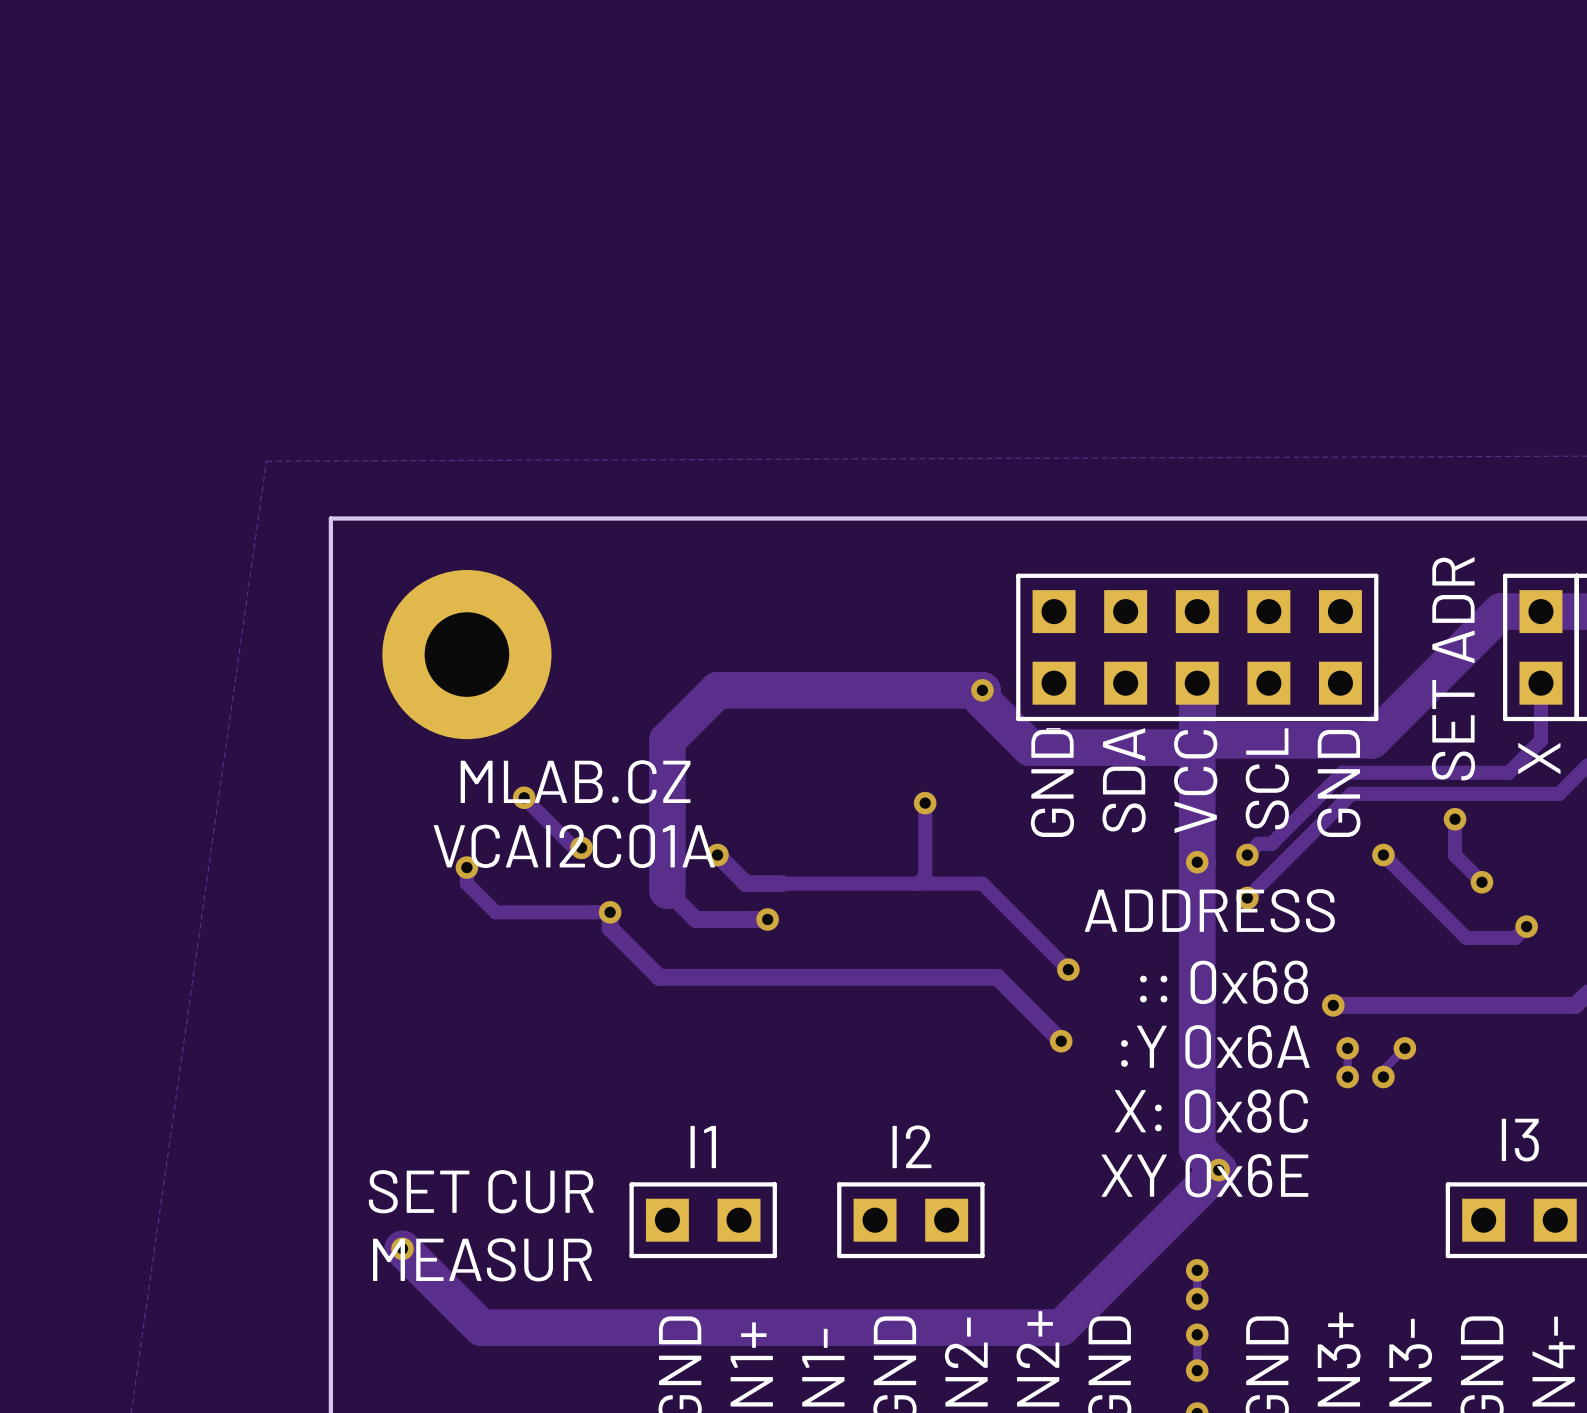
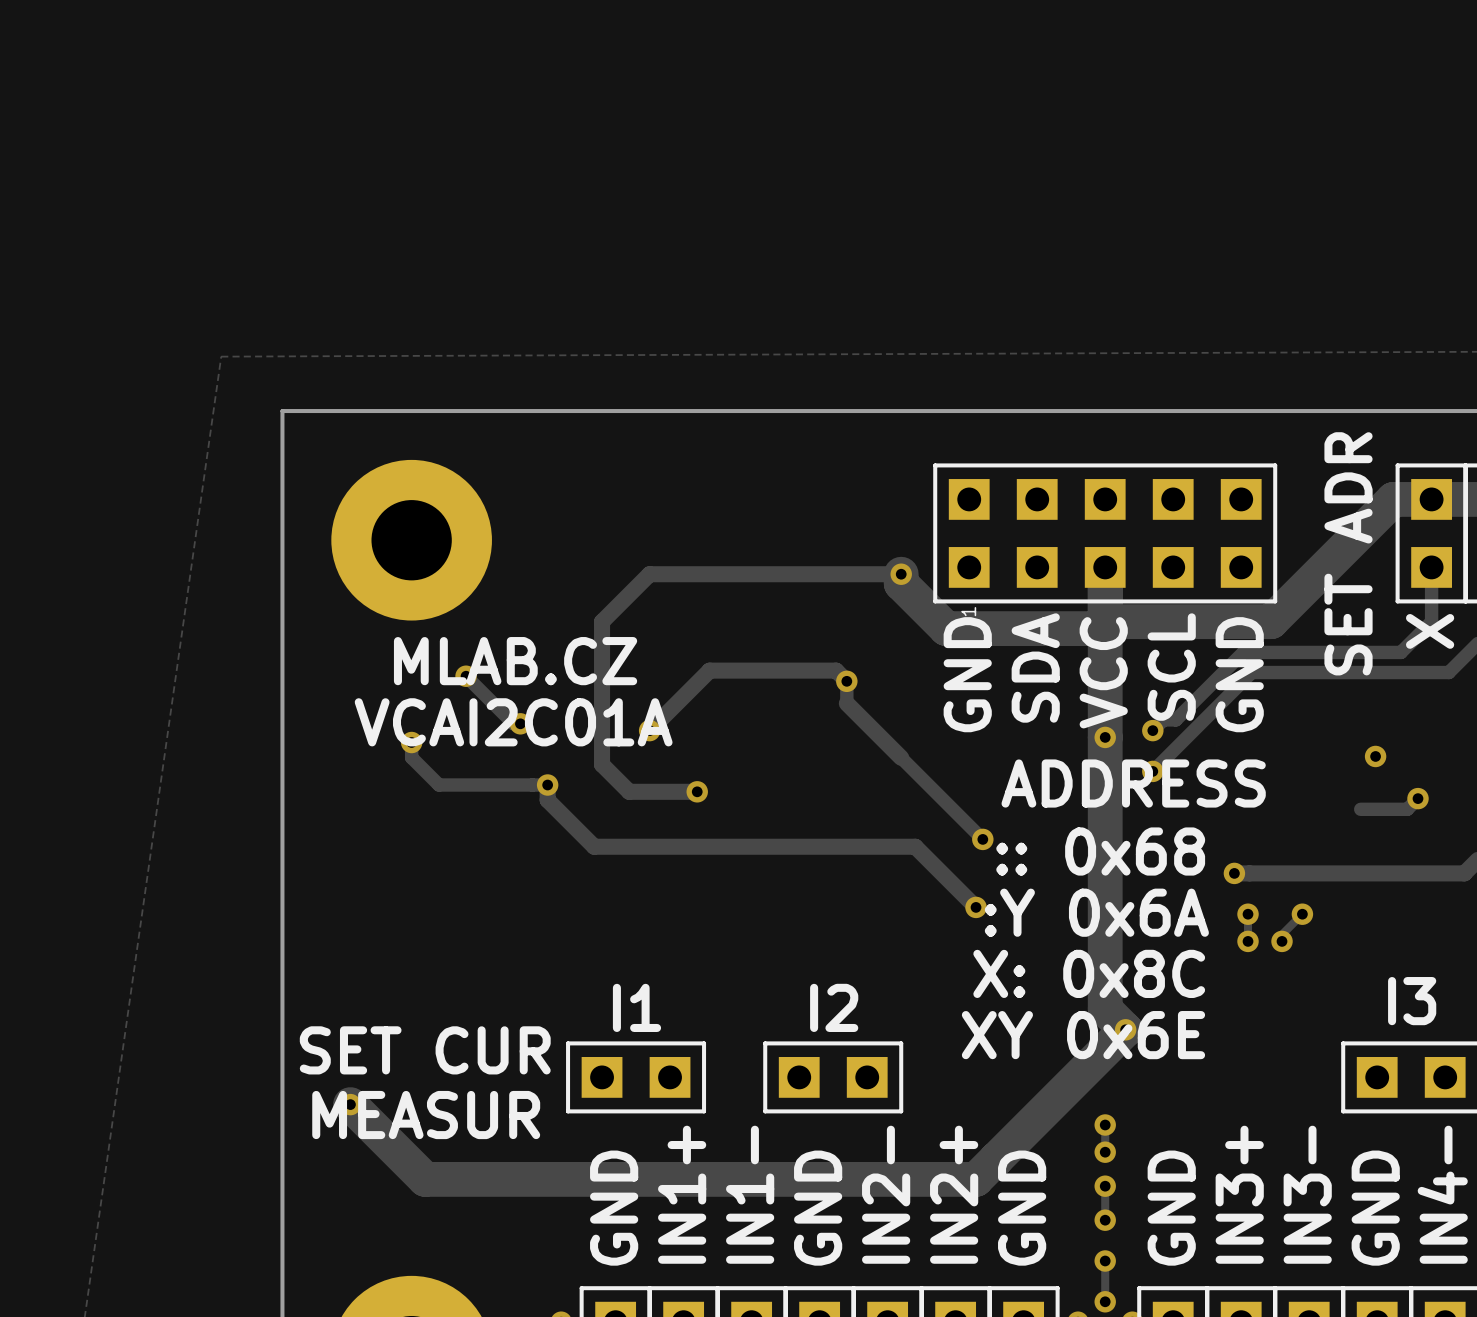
track width: thick (982, 690) (717, 690) (667, 740) (667, 890) -> thin (901, 574) (649, 574) (602, 621) (602, 764)
track: (1455, 819) (1455, 855) (1481, 882) -> none
via: (1455, 819) -> none
track: (925, 826) (925, 876) (918, 883) -> (846, 703) (901, 757)
track: (717, 855) (746, 883) (982, 883) -> (649, 730) (709, 670) (836, 670) (846, 681)
track: (1383, 855) (1466, 937) -> none
via: (1383, 855) -> none

